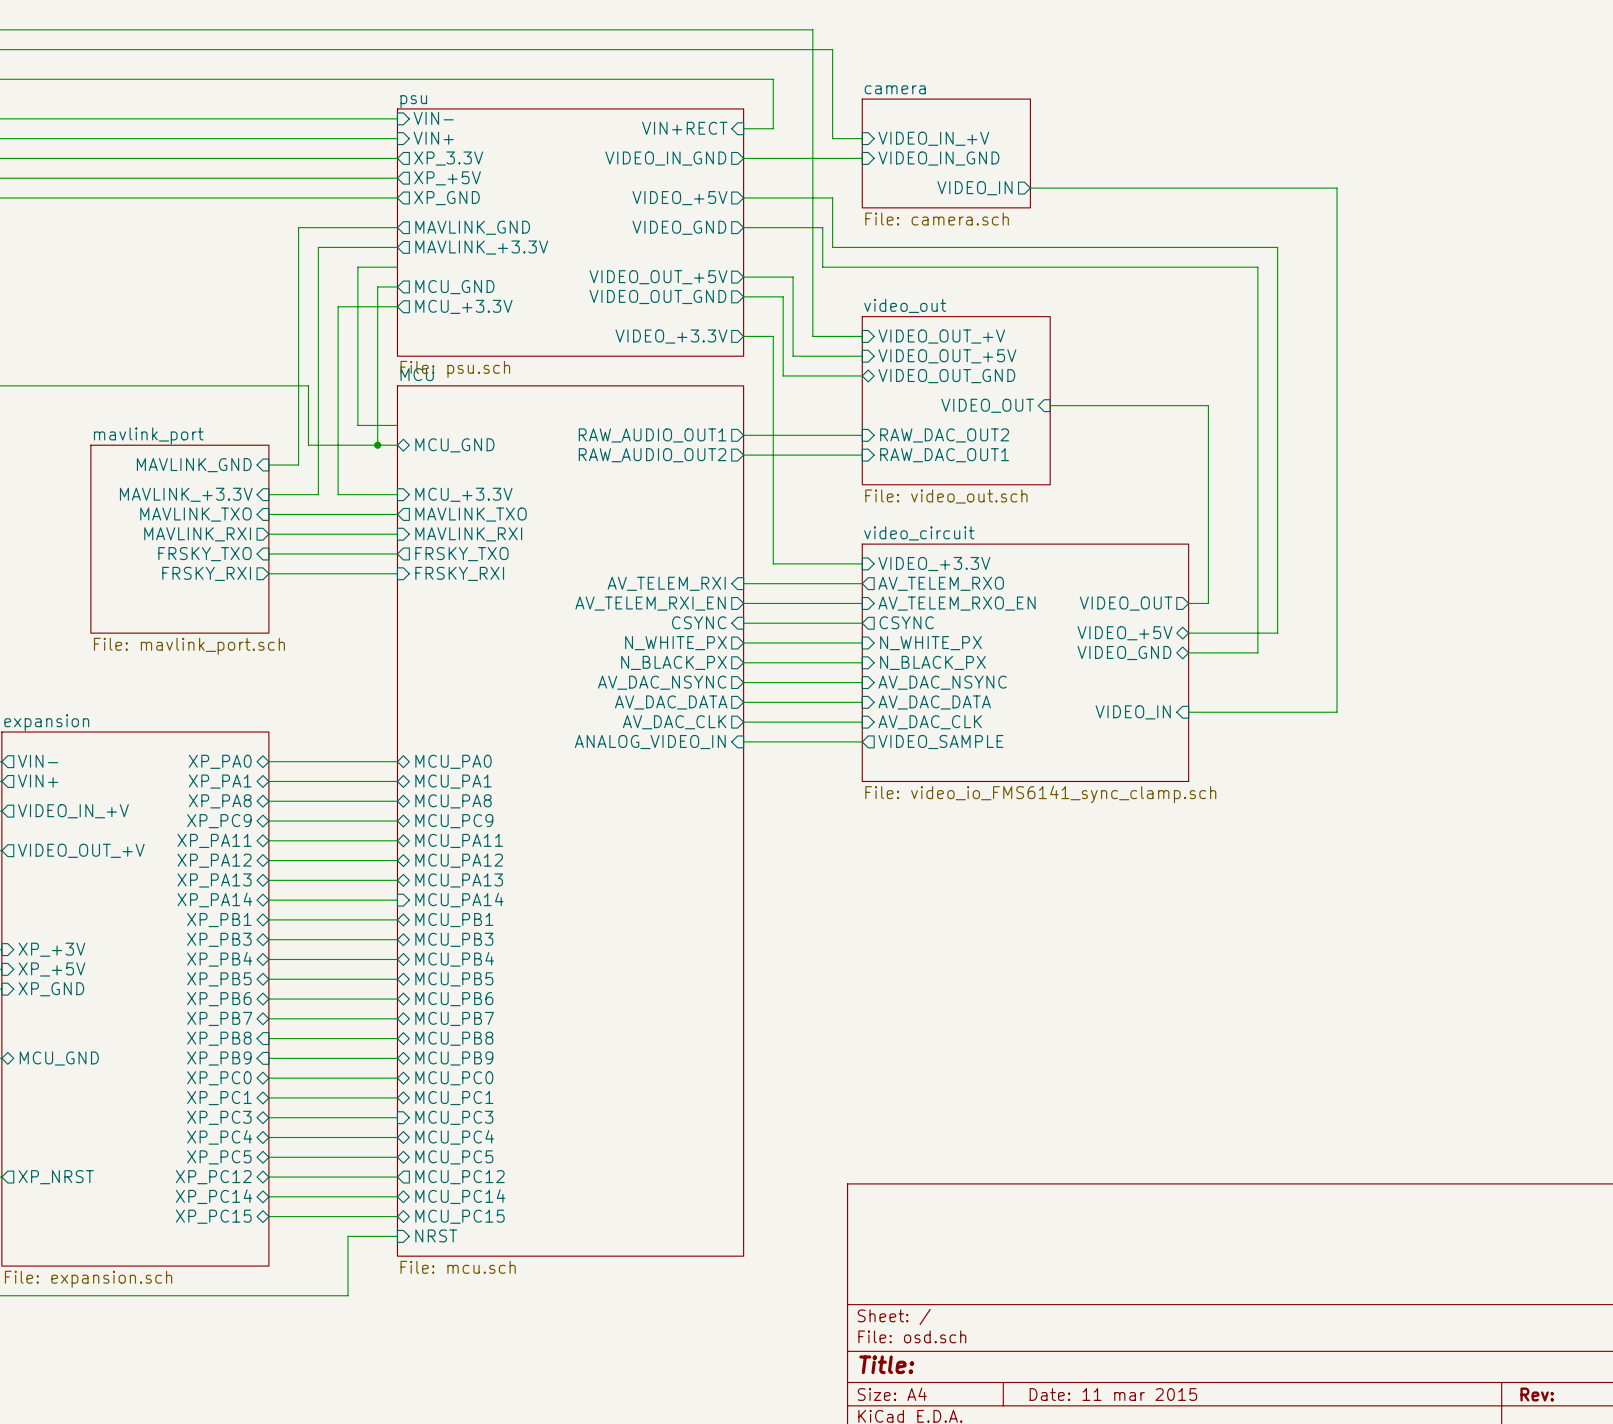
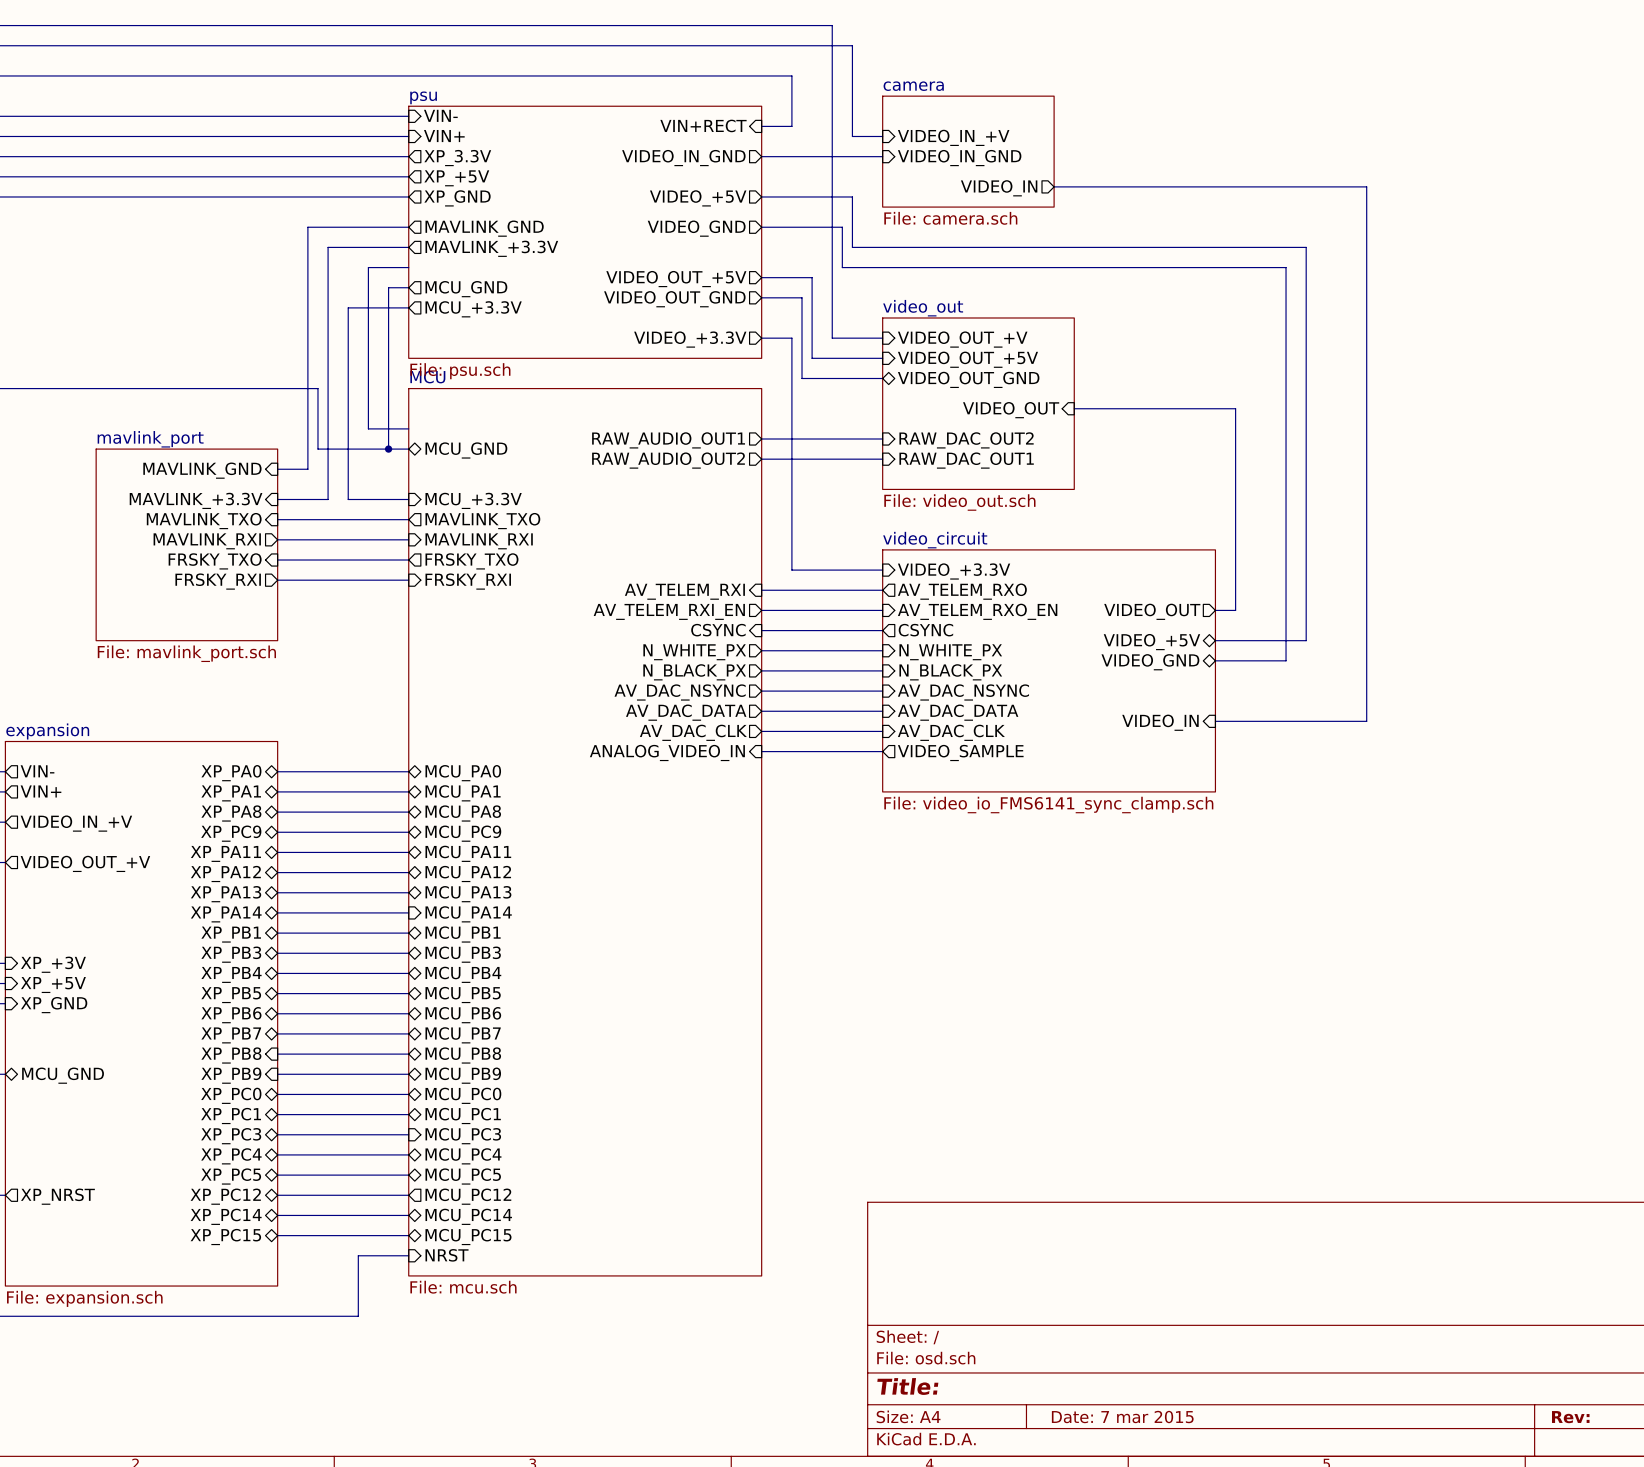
title block: Date: 11 mar 2015 (1113, 1394) -> Date: 7 mar 2015 (1122, 1417)

